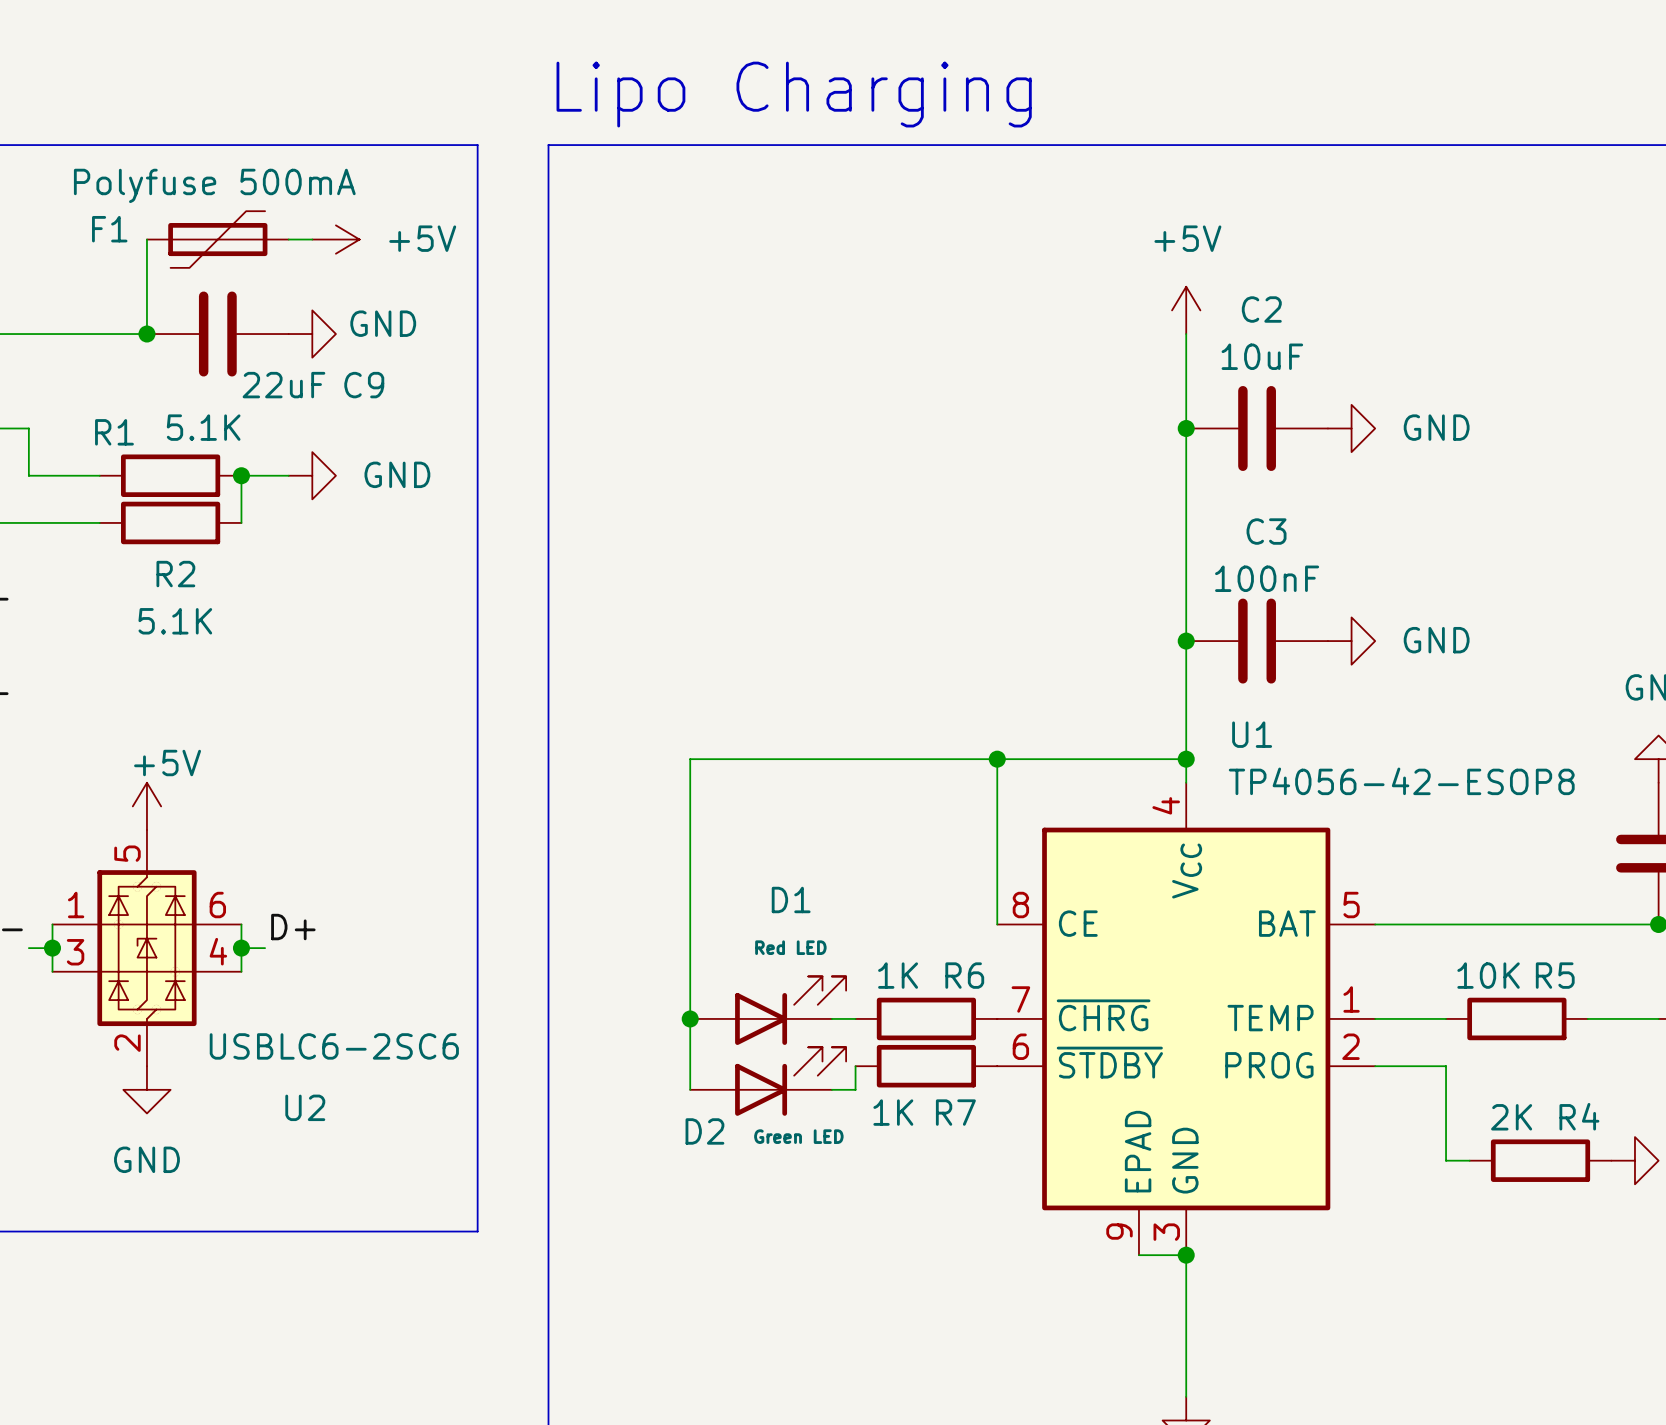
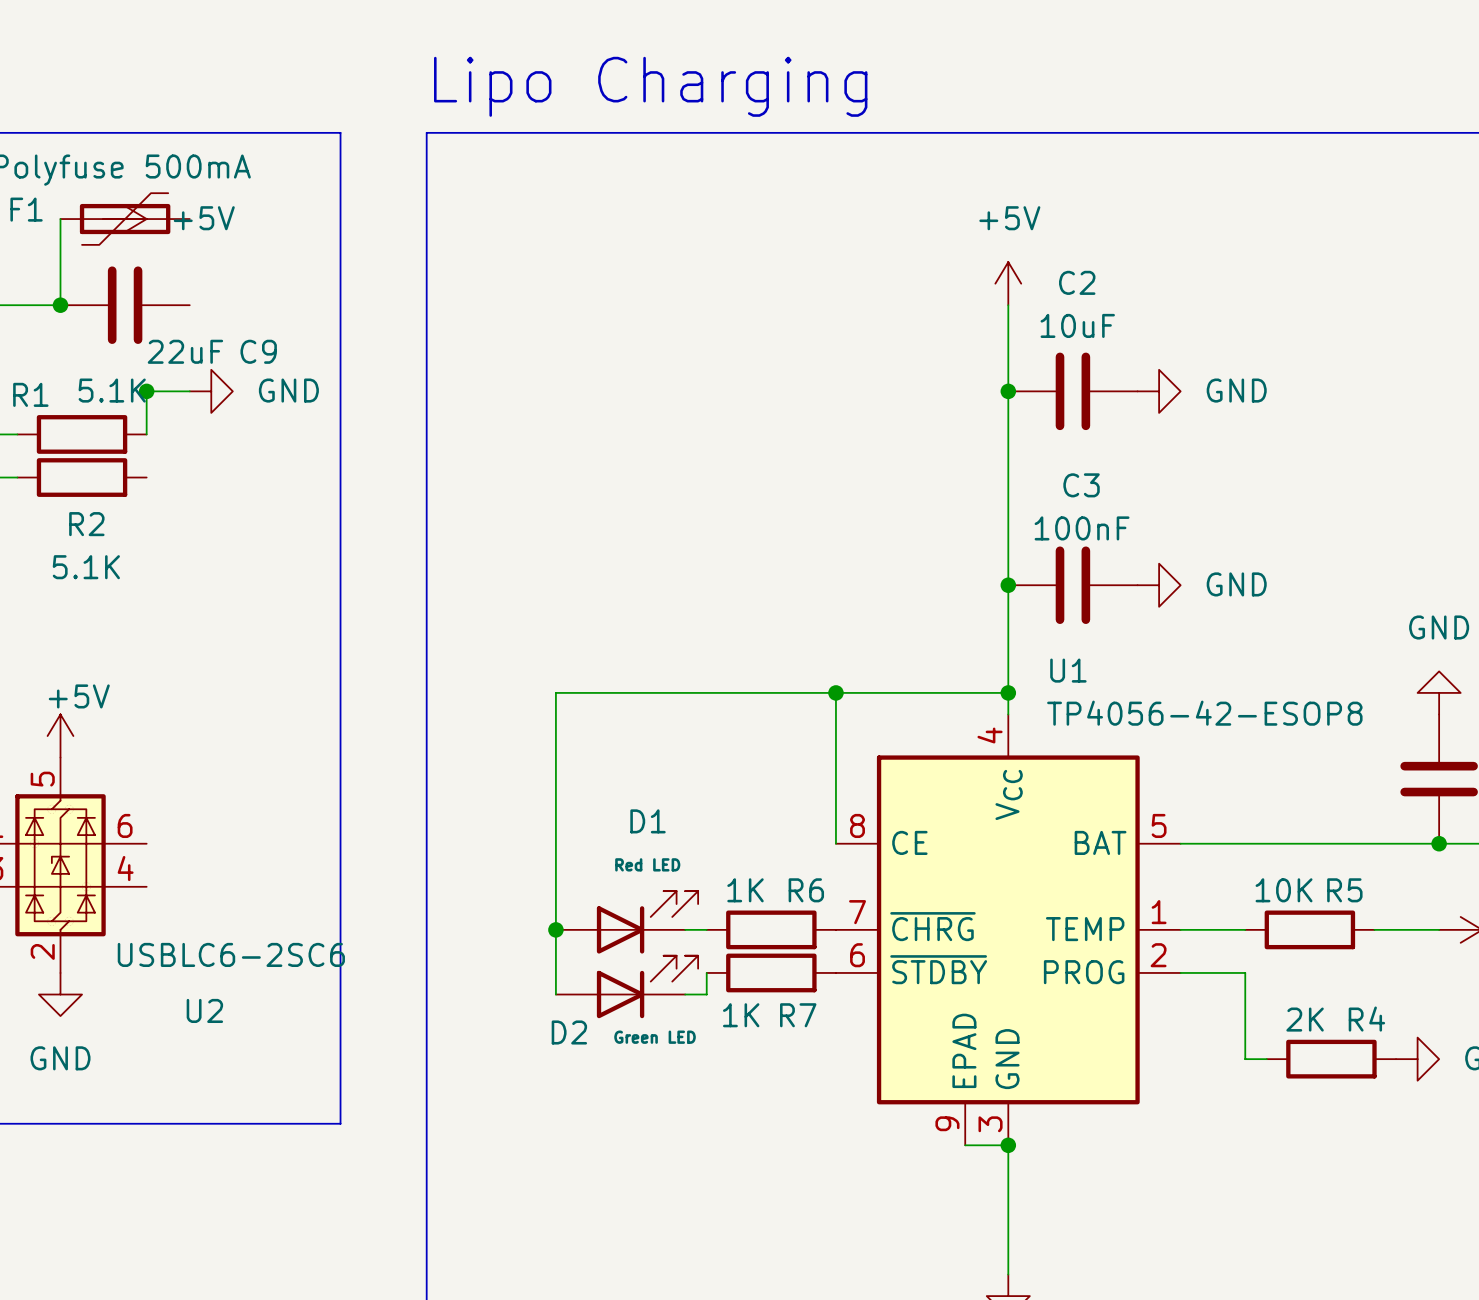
line: (454, 145) (477, 145) (477, 1231) (454, 1231) -> (340, 132) (340, 1123)
wire: (288, 239) (312, 239) -> none
power symbol position: +5V (335, 239) -> +5V (125, 219)
power symbol: GND (312, 334) -> none
power symbol: none -> GND (211, 391)
junction position: (241, 475) -> (146, 391)
wire: (288, 475) (241, 475) (241, 522) -> (189, 391) (146, 391) (146, 434)
power symbol: GND (312, 475) -> none
wire: (241, 924) (241, 971) -> none
label: D+ (293, 927) -> none
wire: (241, 948) (265, 948) -> none
junction: (241, 948) -> none

